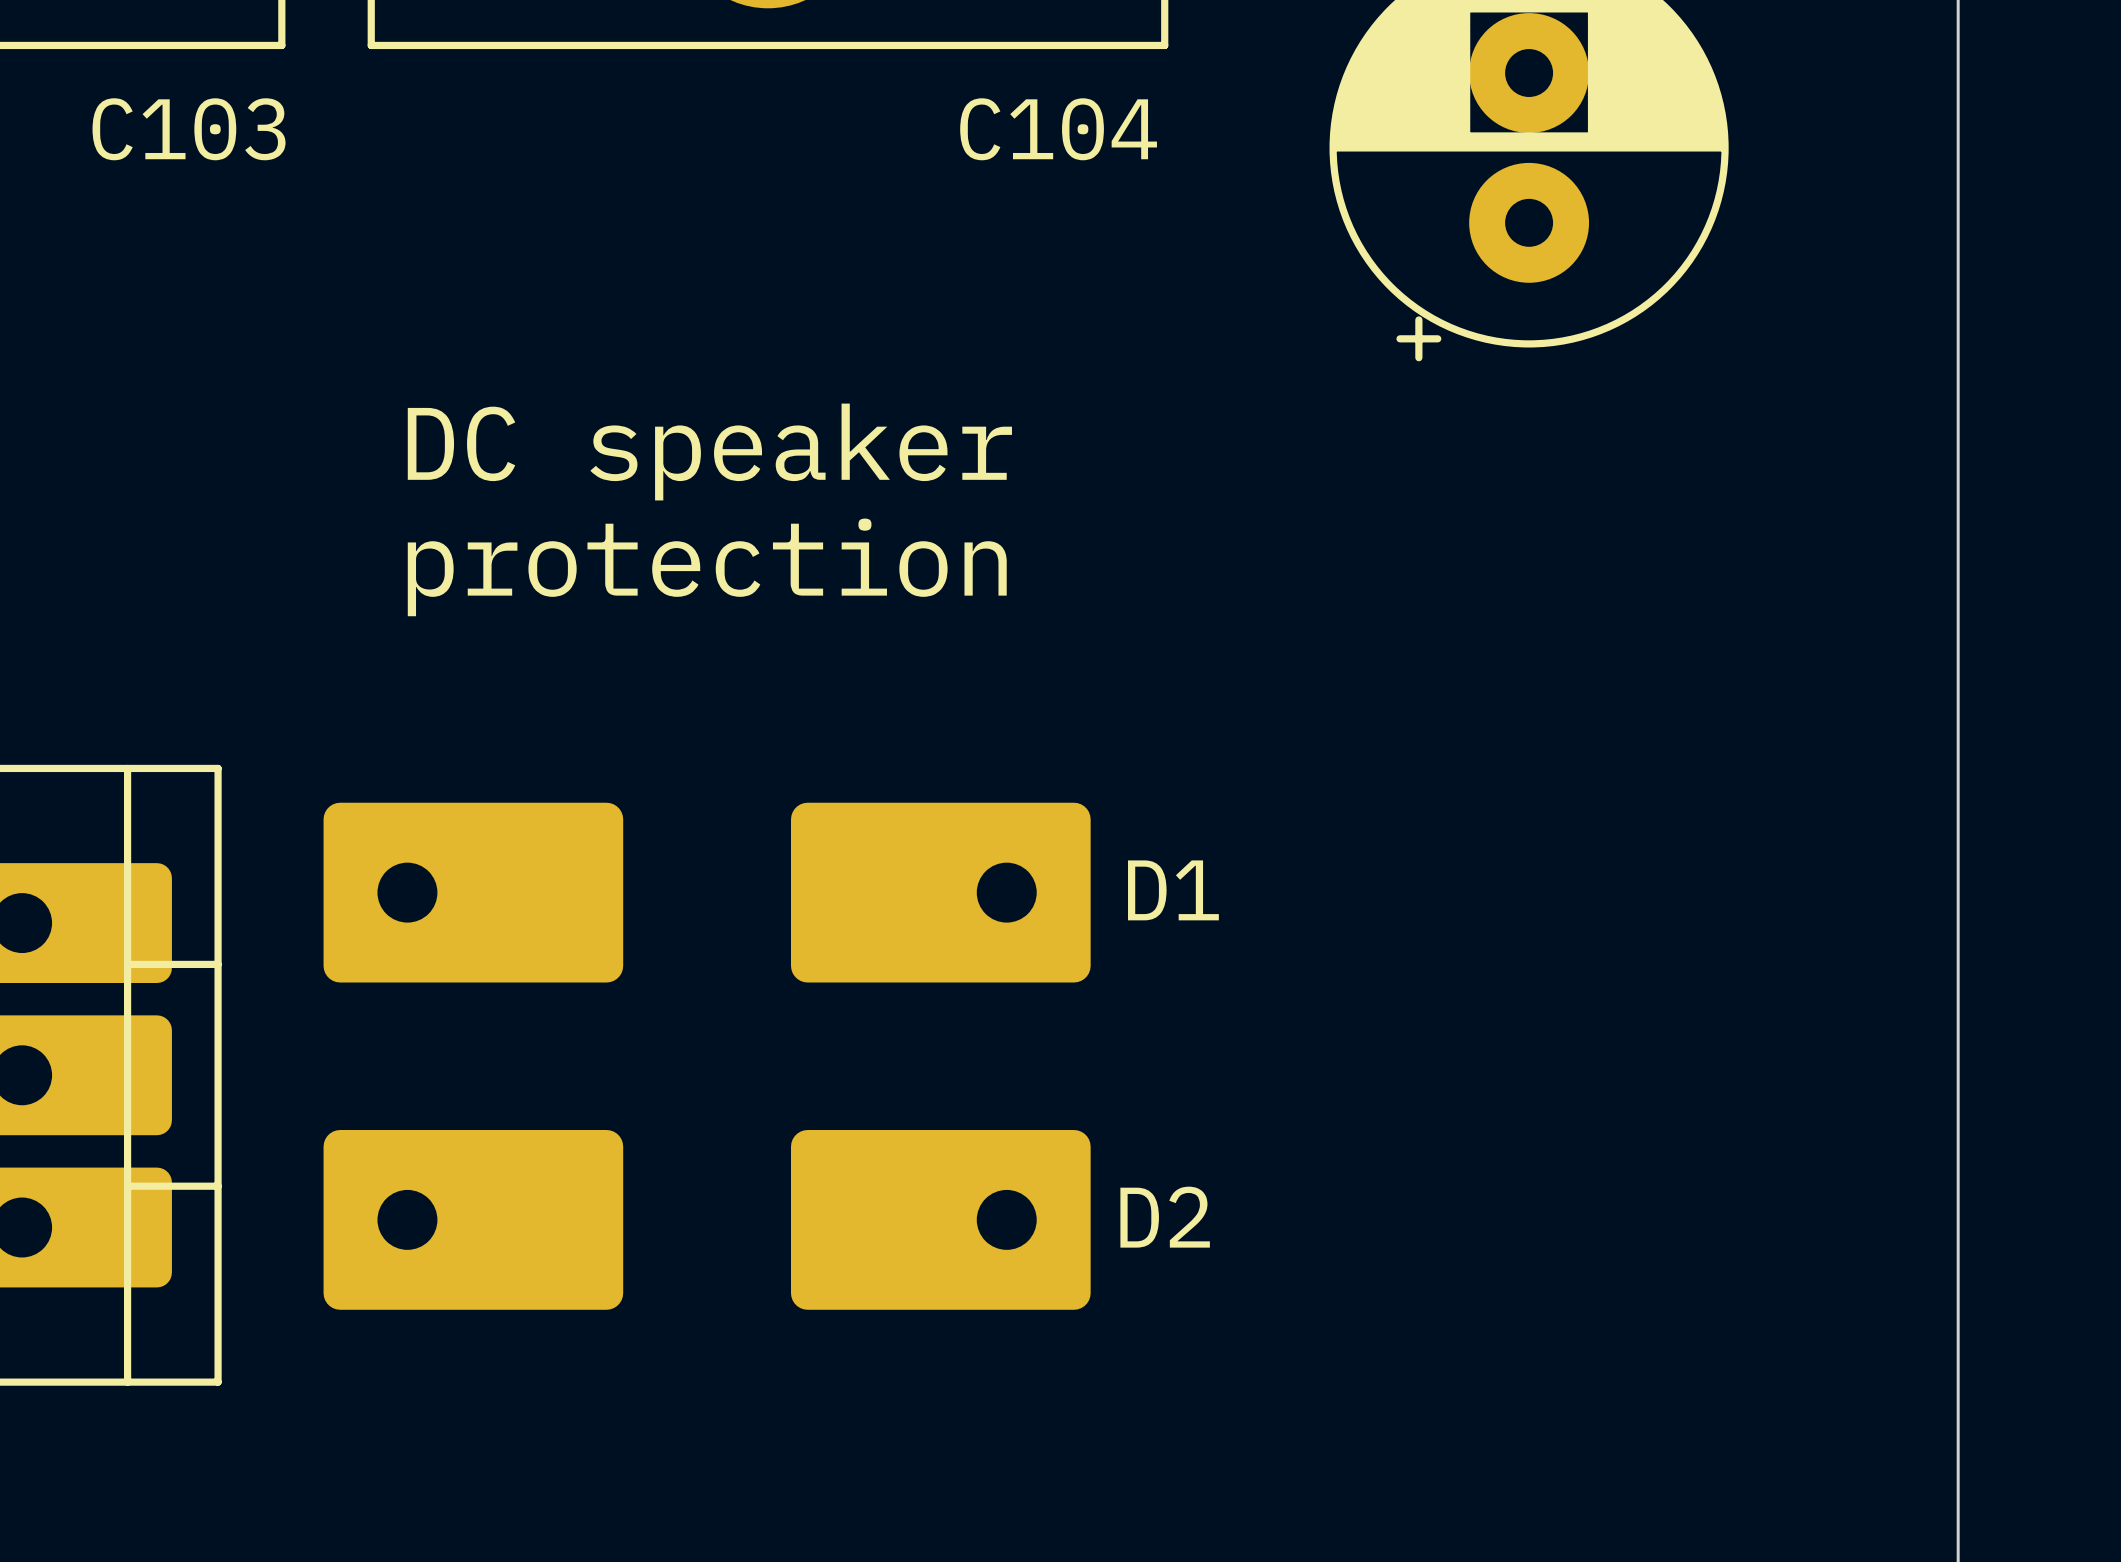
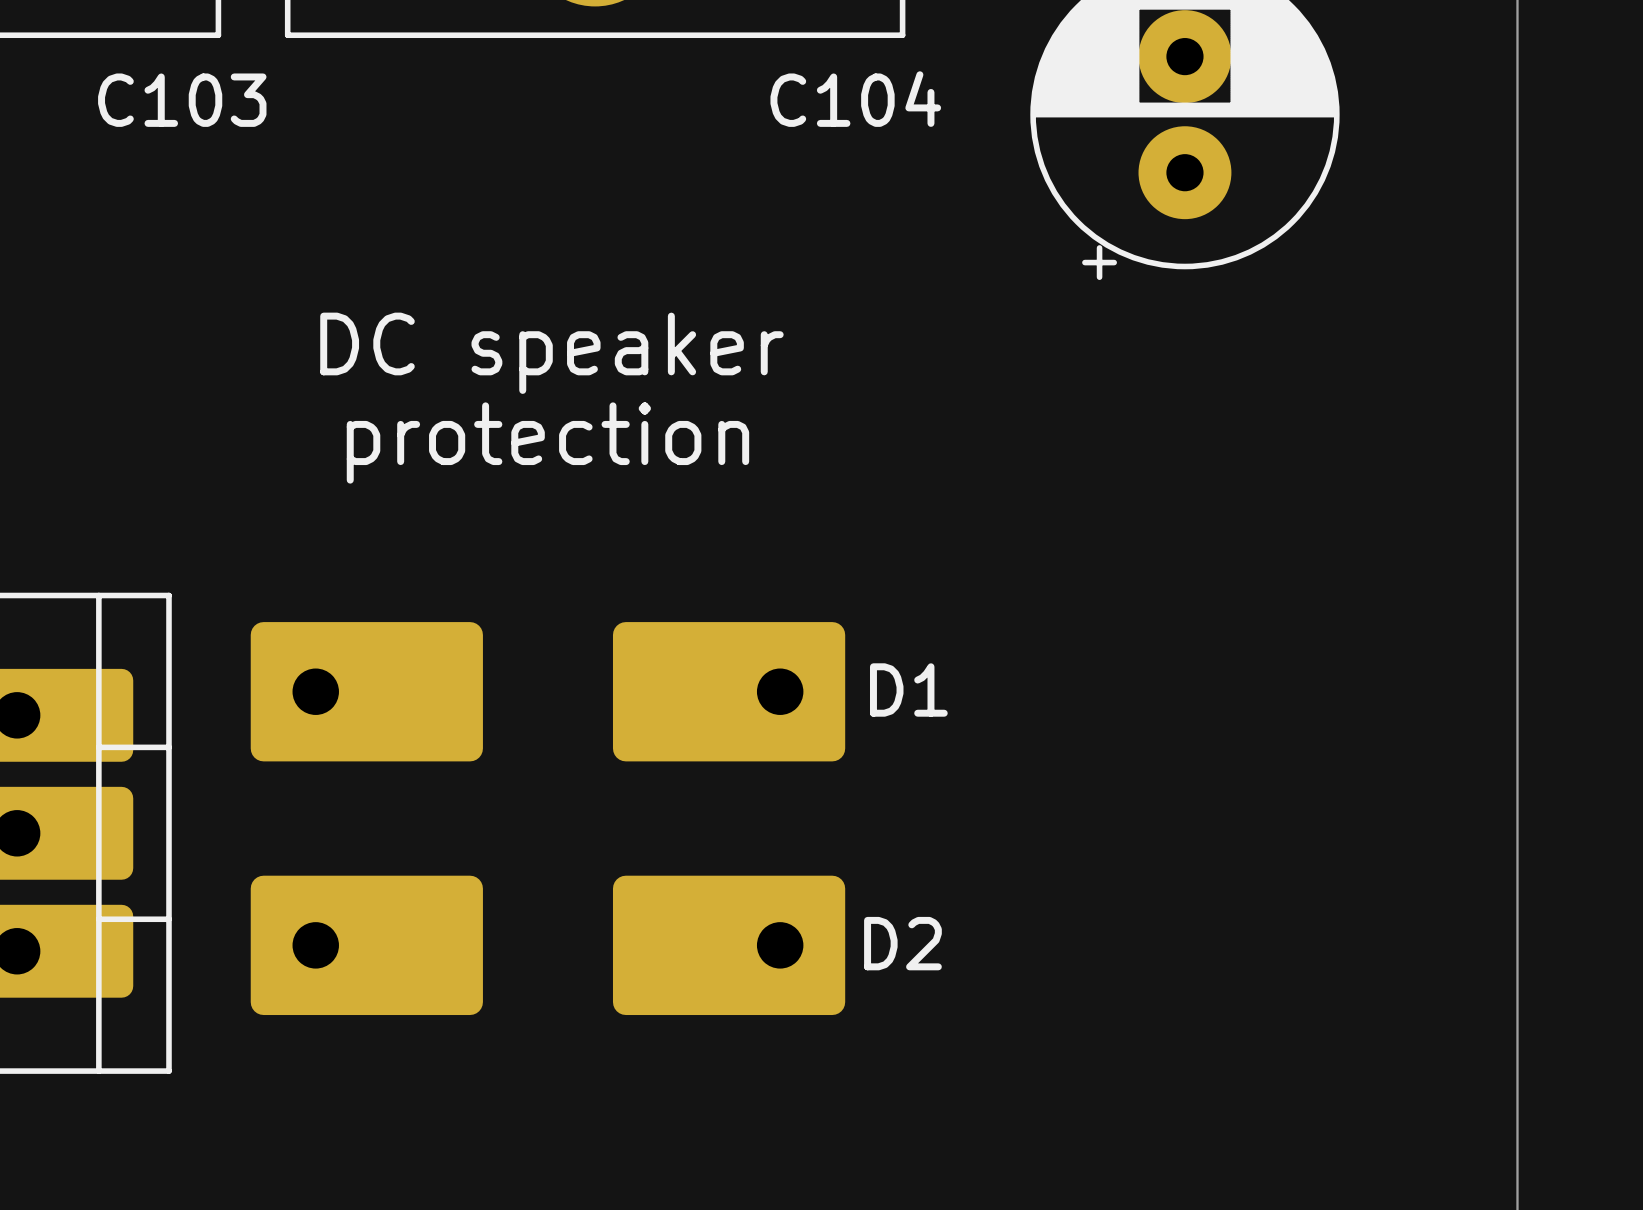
C103 name position: C103 (189, 129) -> C103 (182, 100)
C104 name position: C104 (1058, 129) -> C104 (855, 99)

